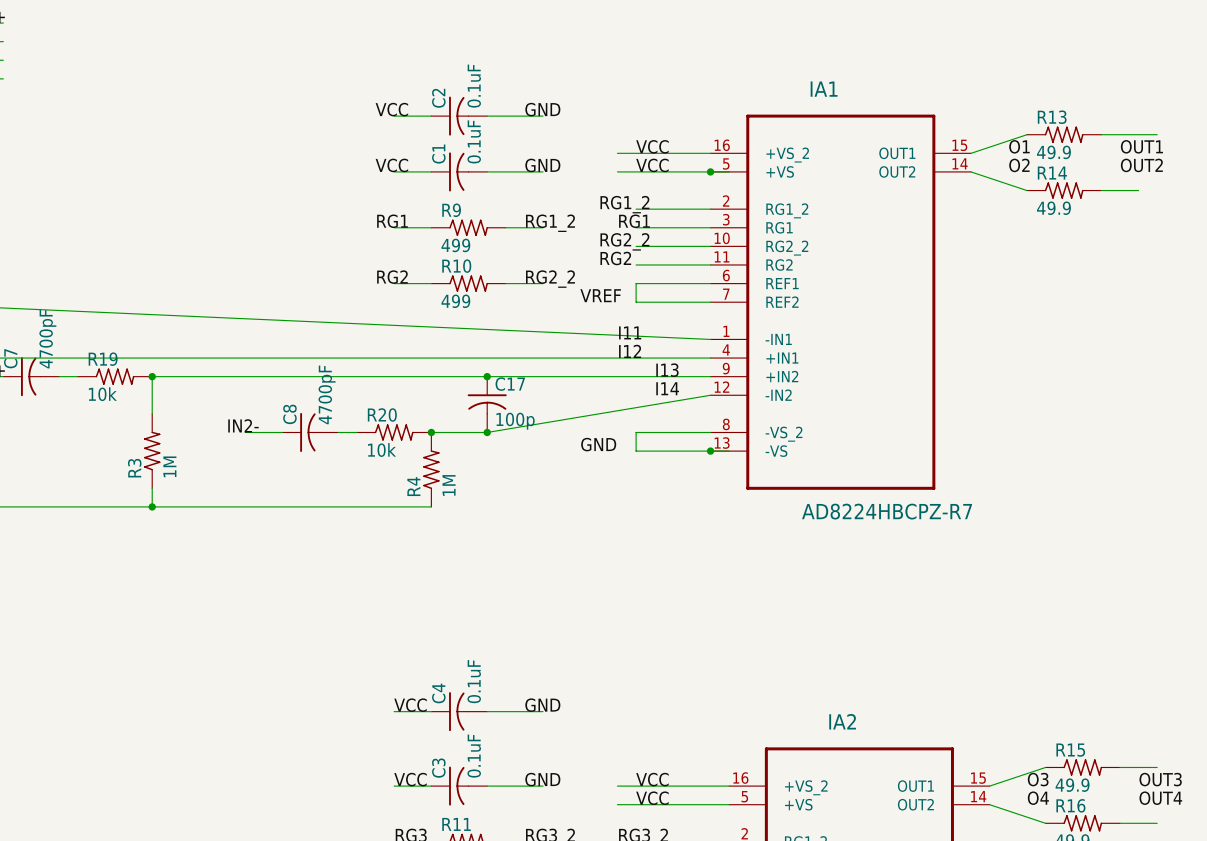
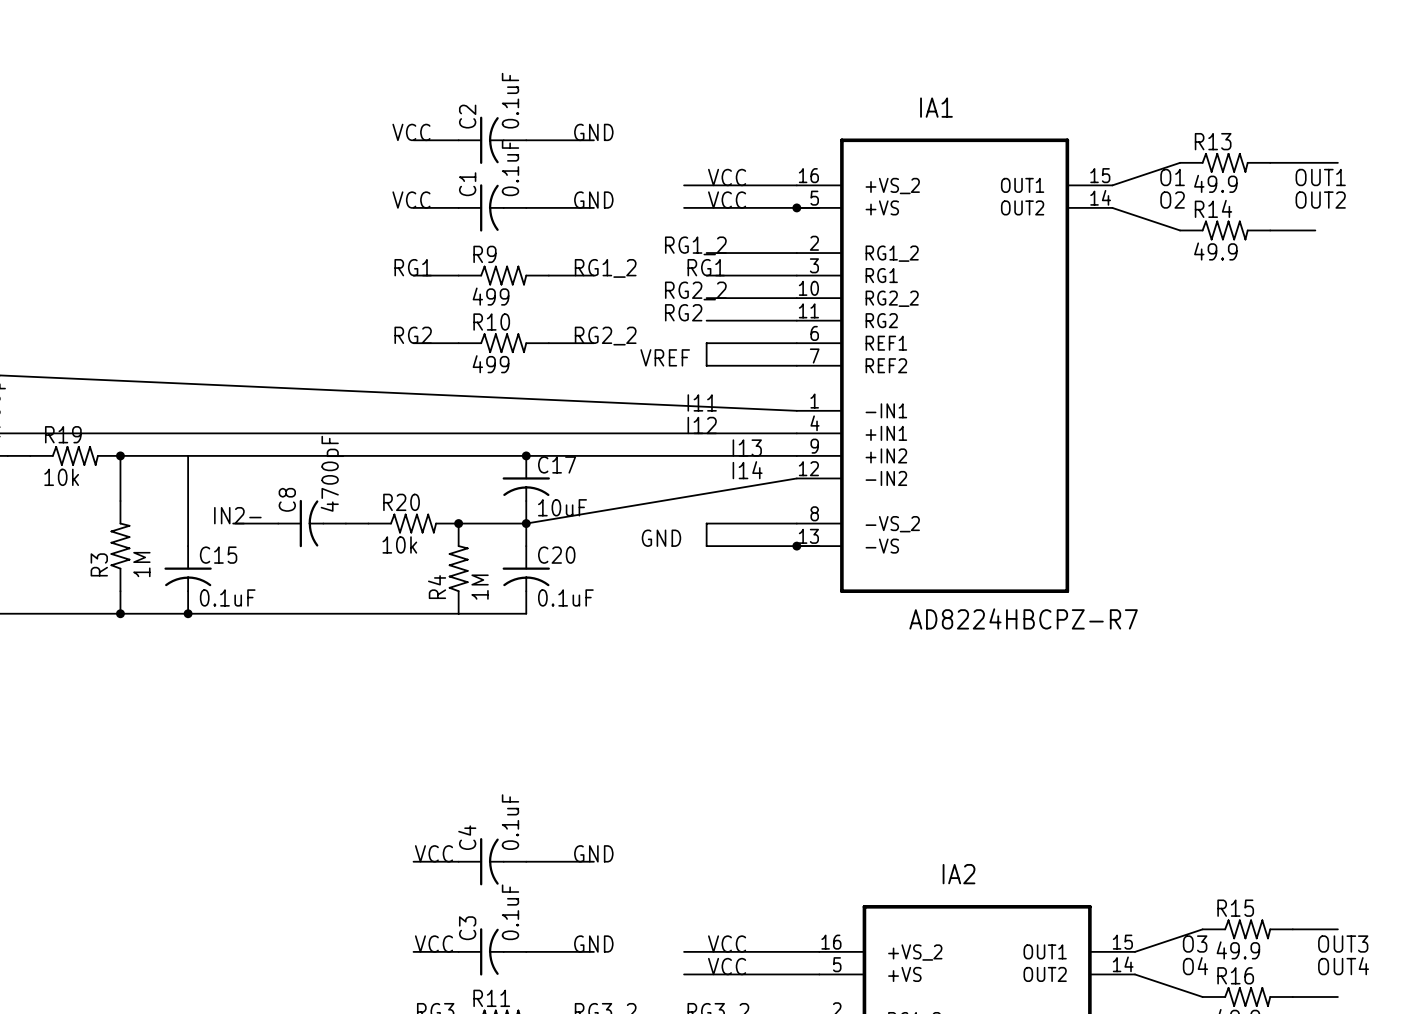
wire: none -> (188, 455) (188, 546)
C17 value: 100p (515, 421) -> 10uF (562, 507)
wire: none -> (526, 523) (526, 546)
C15: none -> 0.1uF (188, 579)
C20: none -> 0.1uF (526, 579)
junction: none -> (188, 613)
wire: none -> (458, 613) (526, 613)

